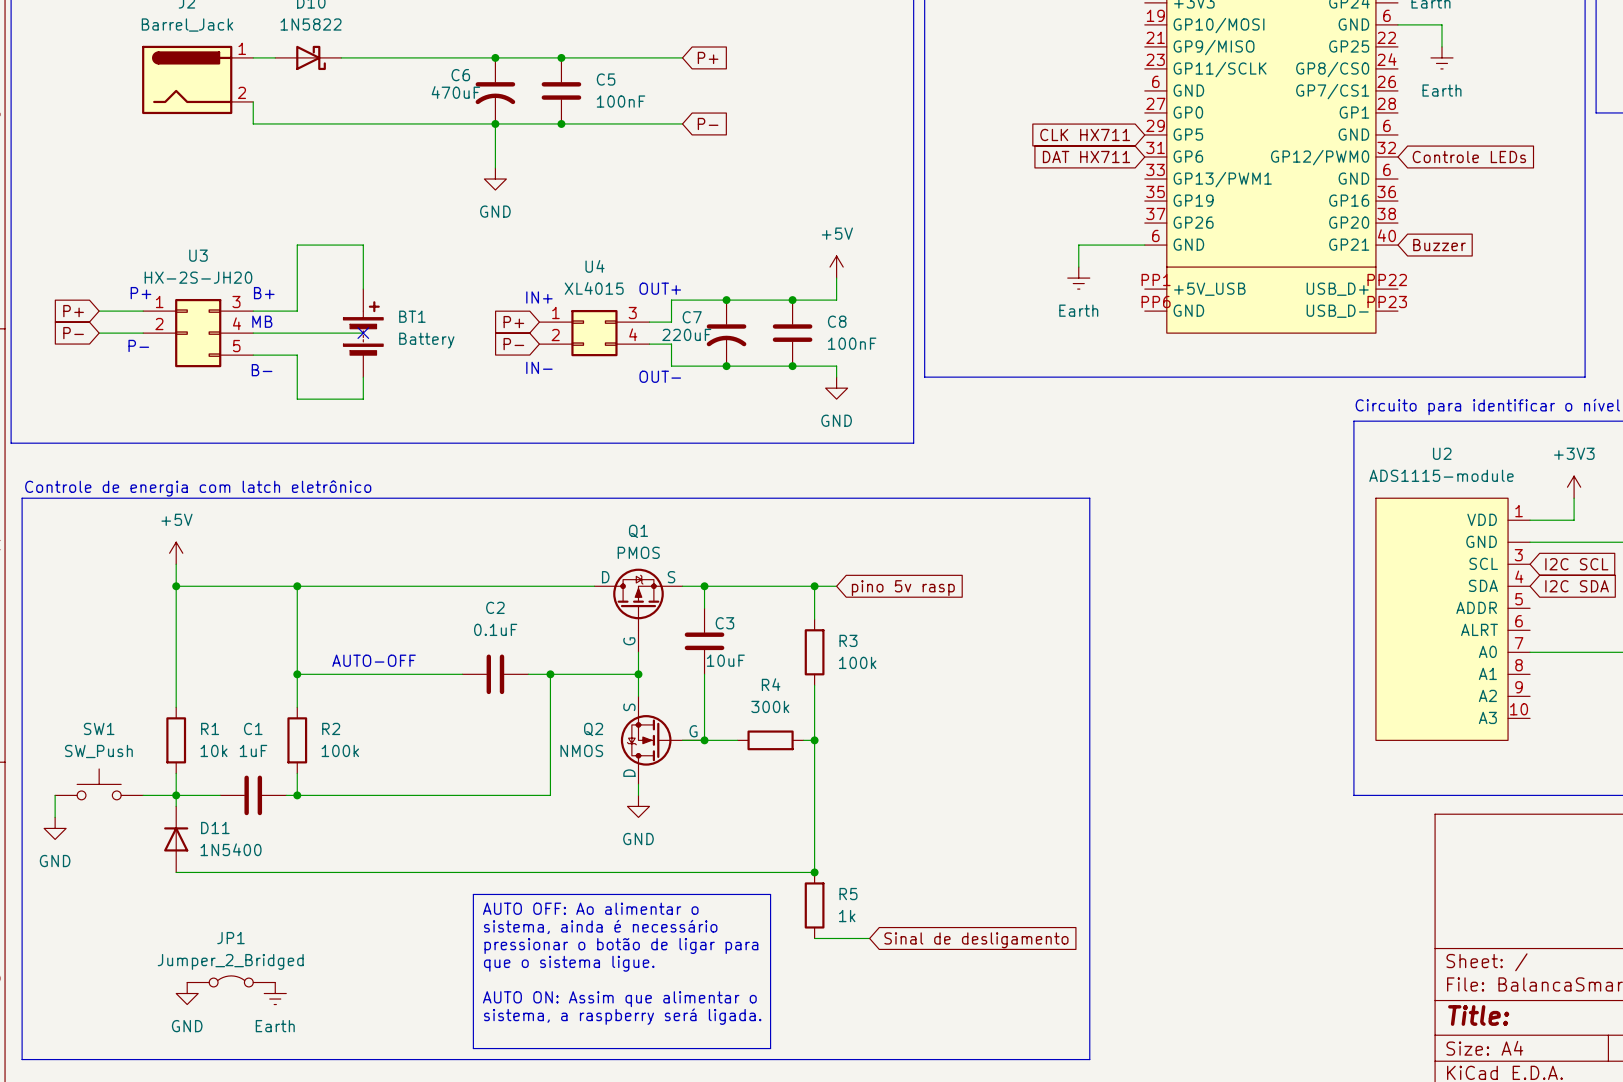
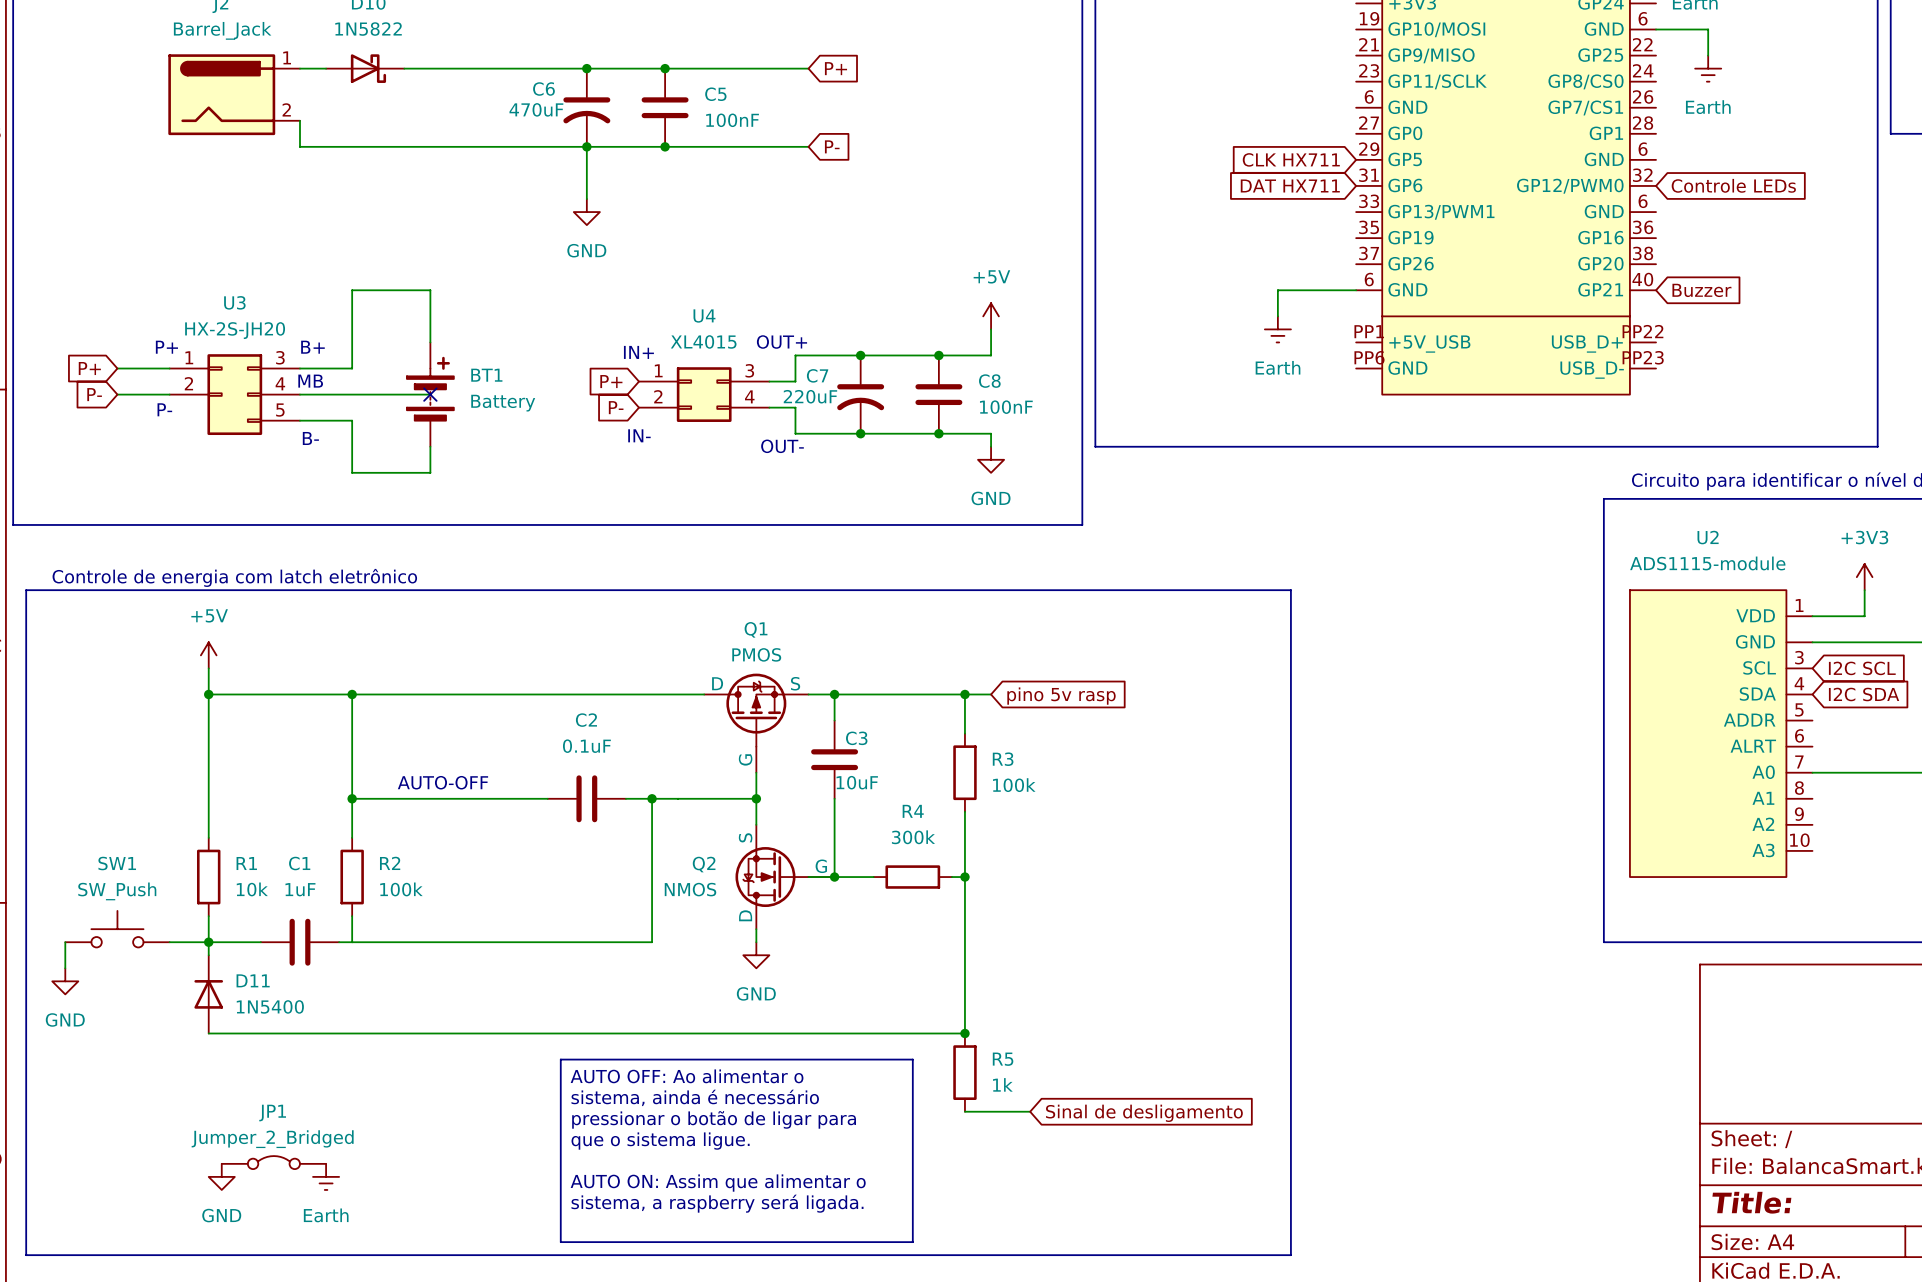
junction: (297, 795) -> none

